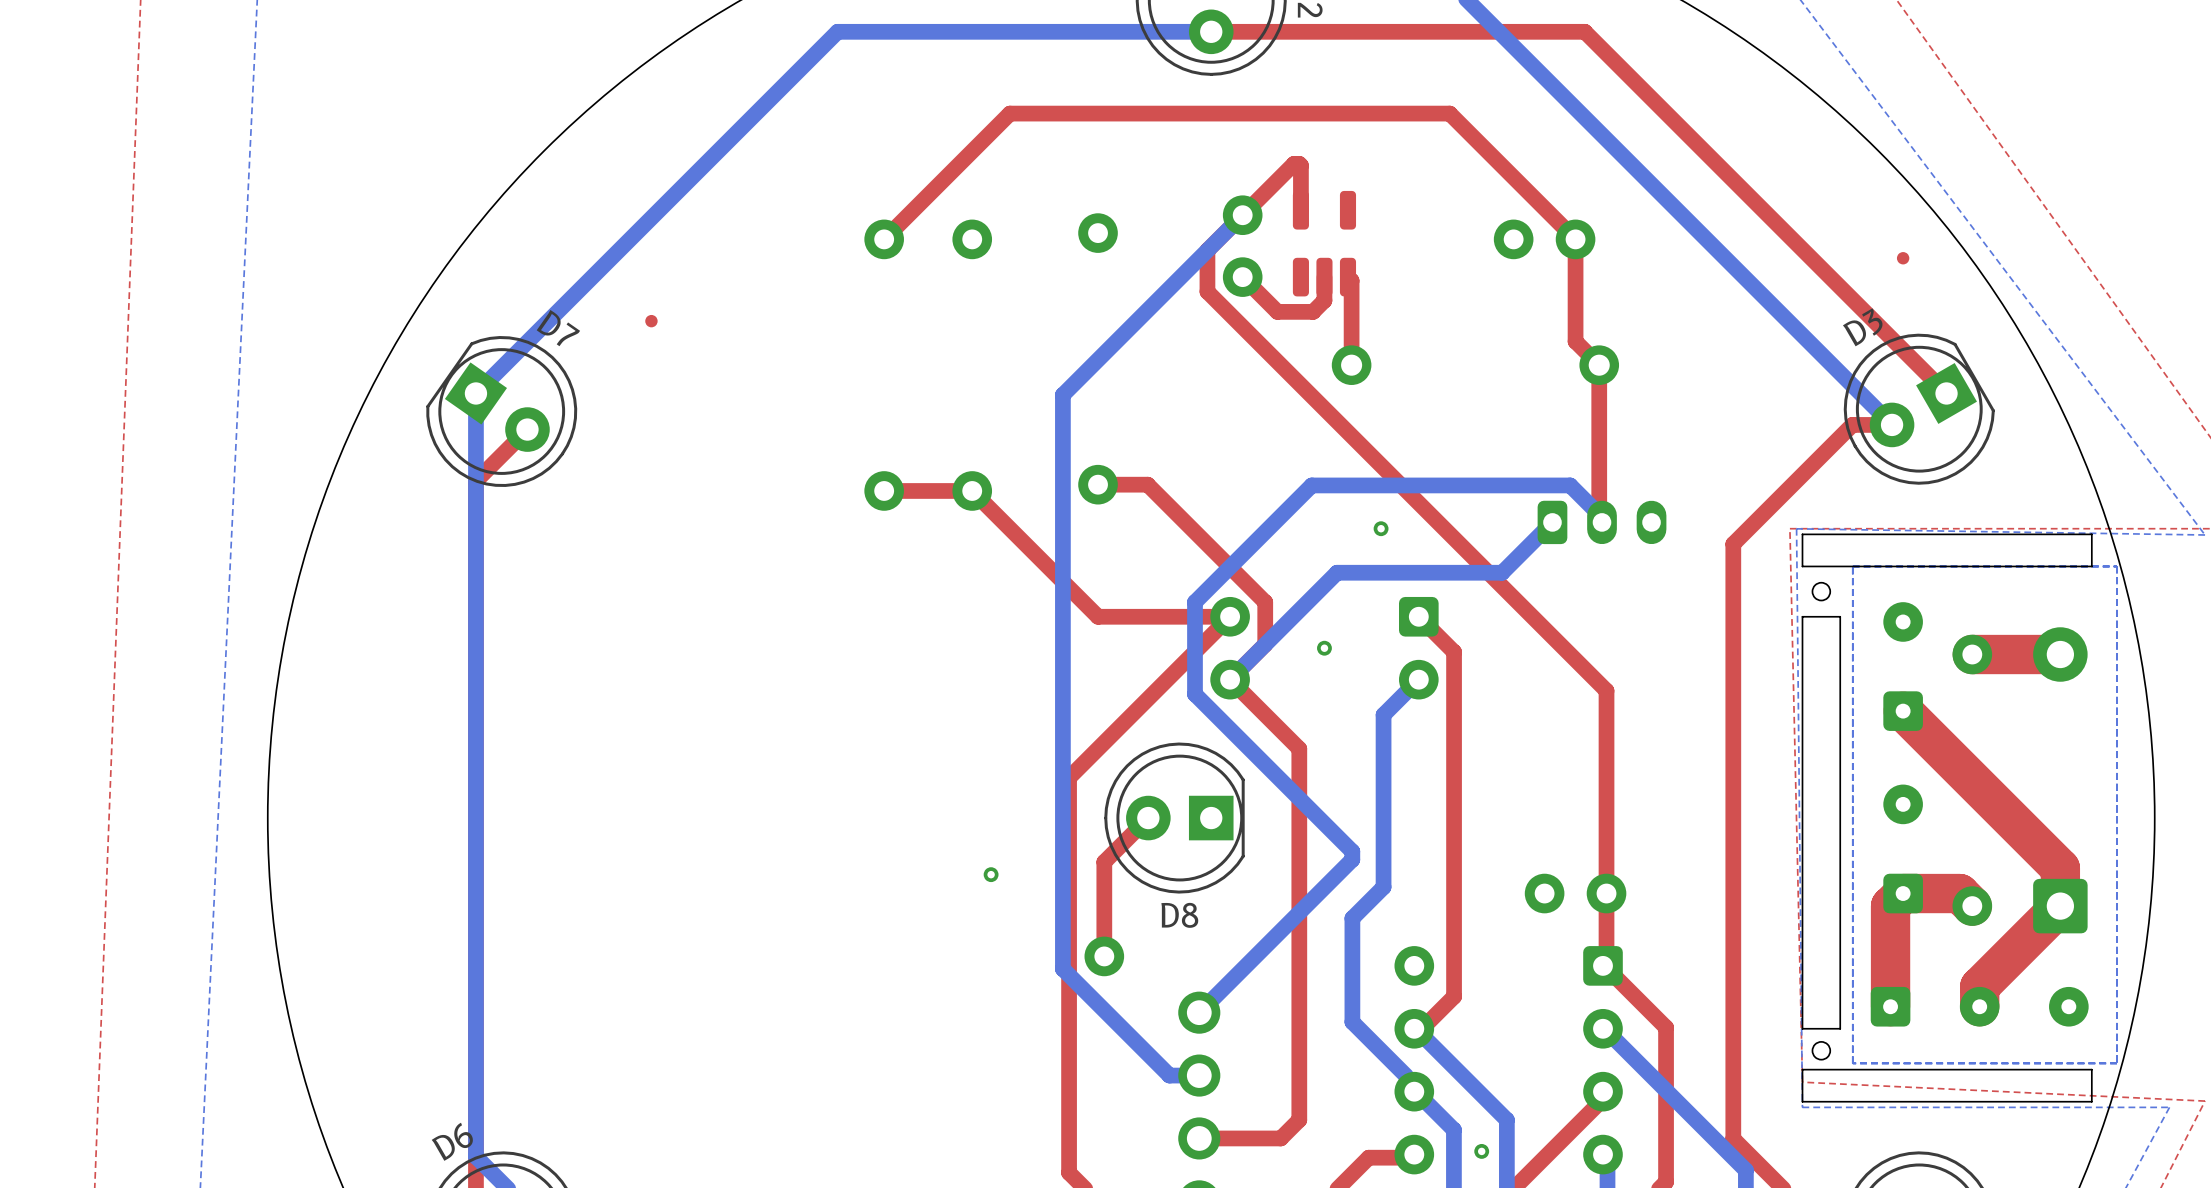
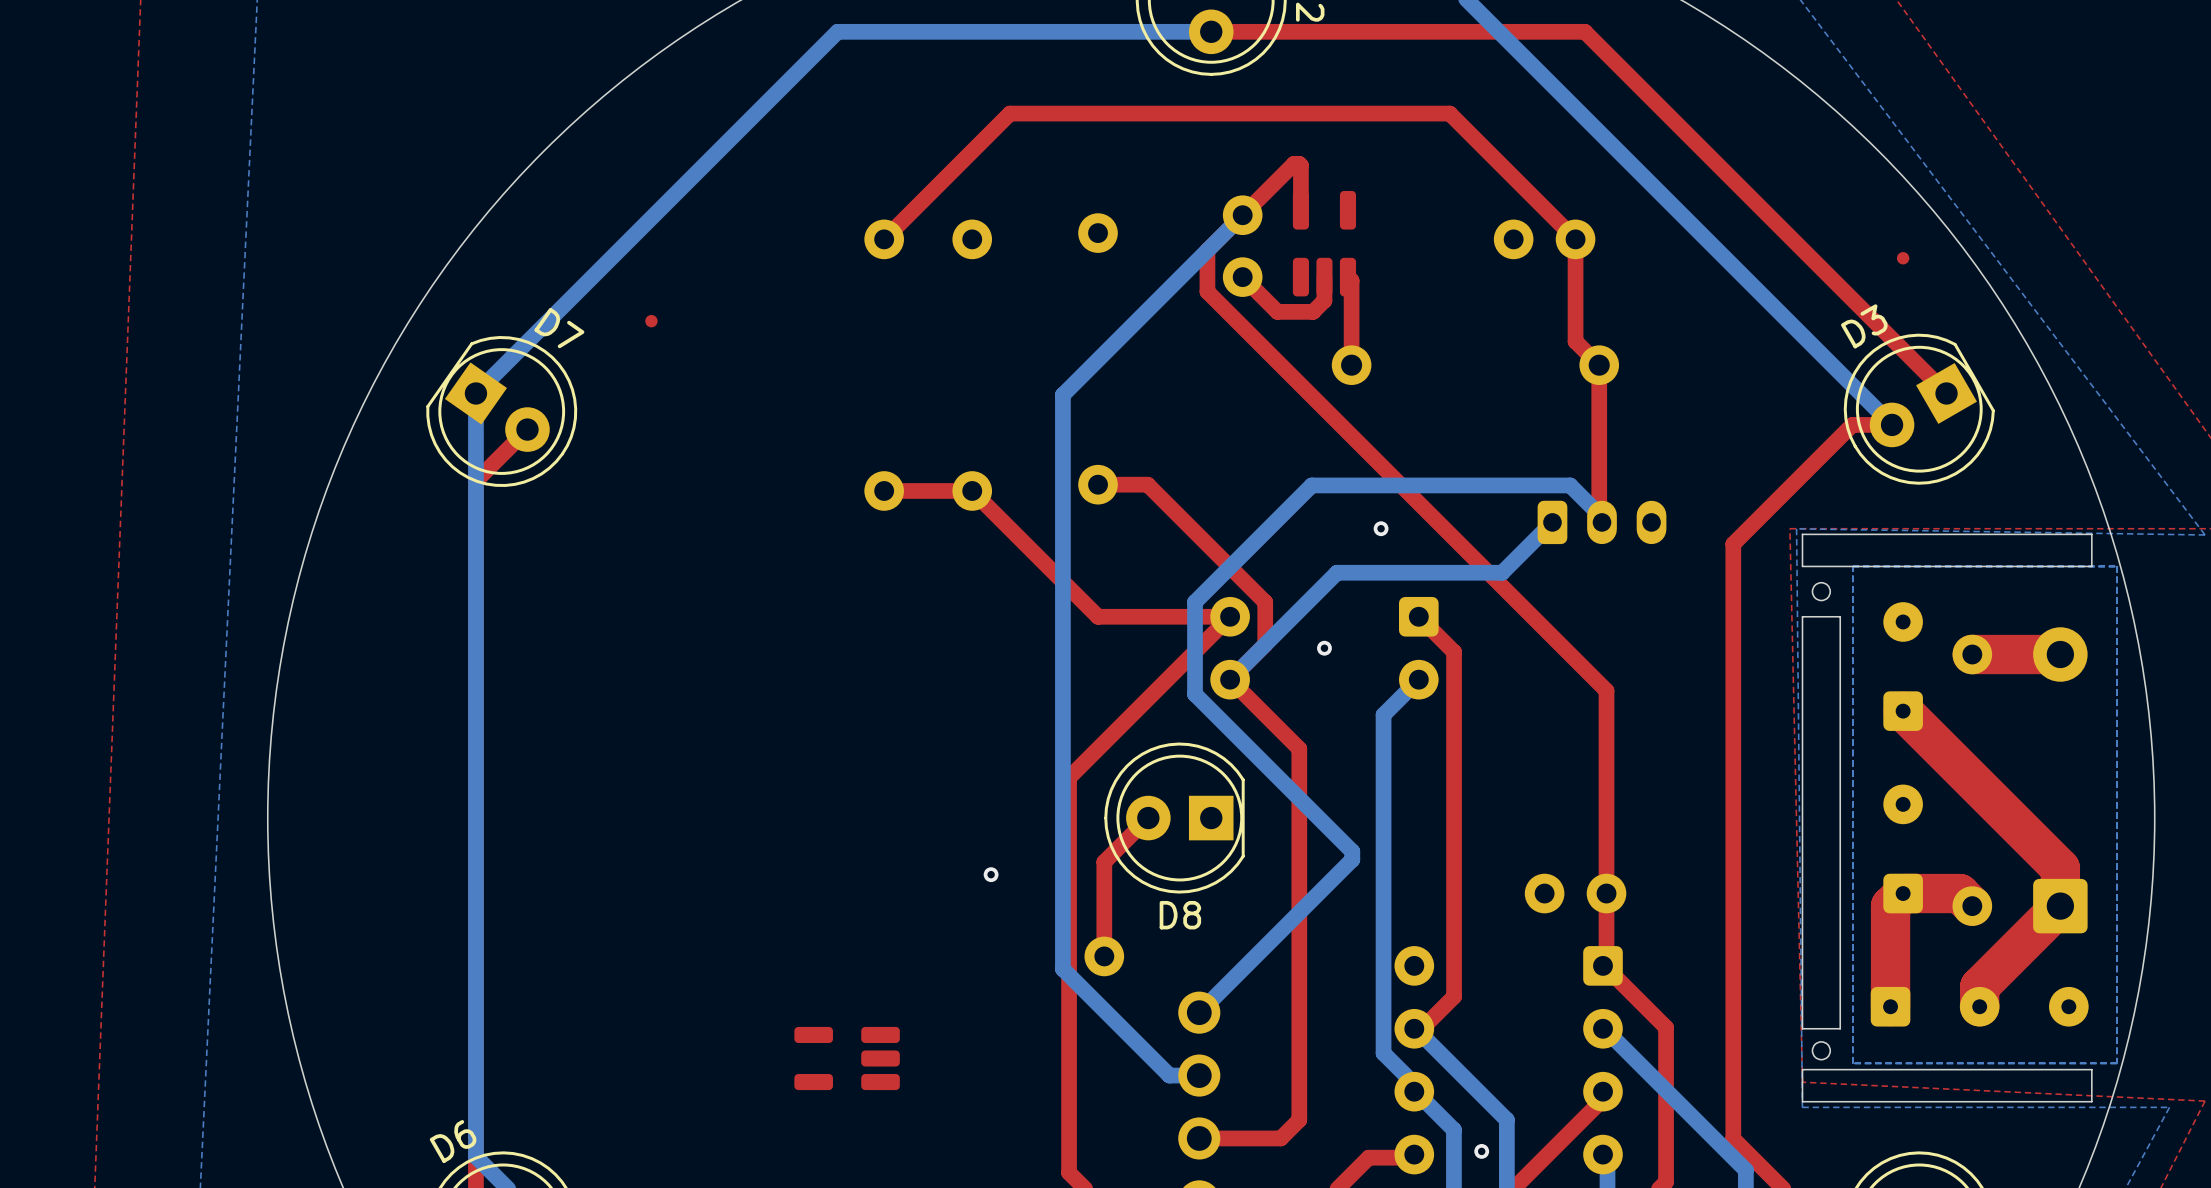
bottom track: (1383, 887) (1352, 918) (1352, 1022) (1383, 1053) -> (1383, 887) (1383, 1053)
part: none -> (847, 1058)

